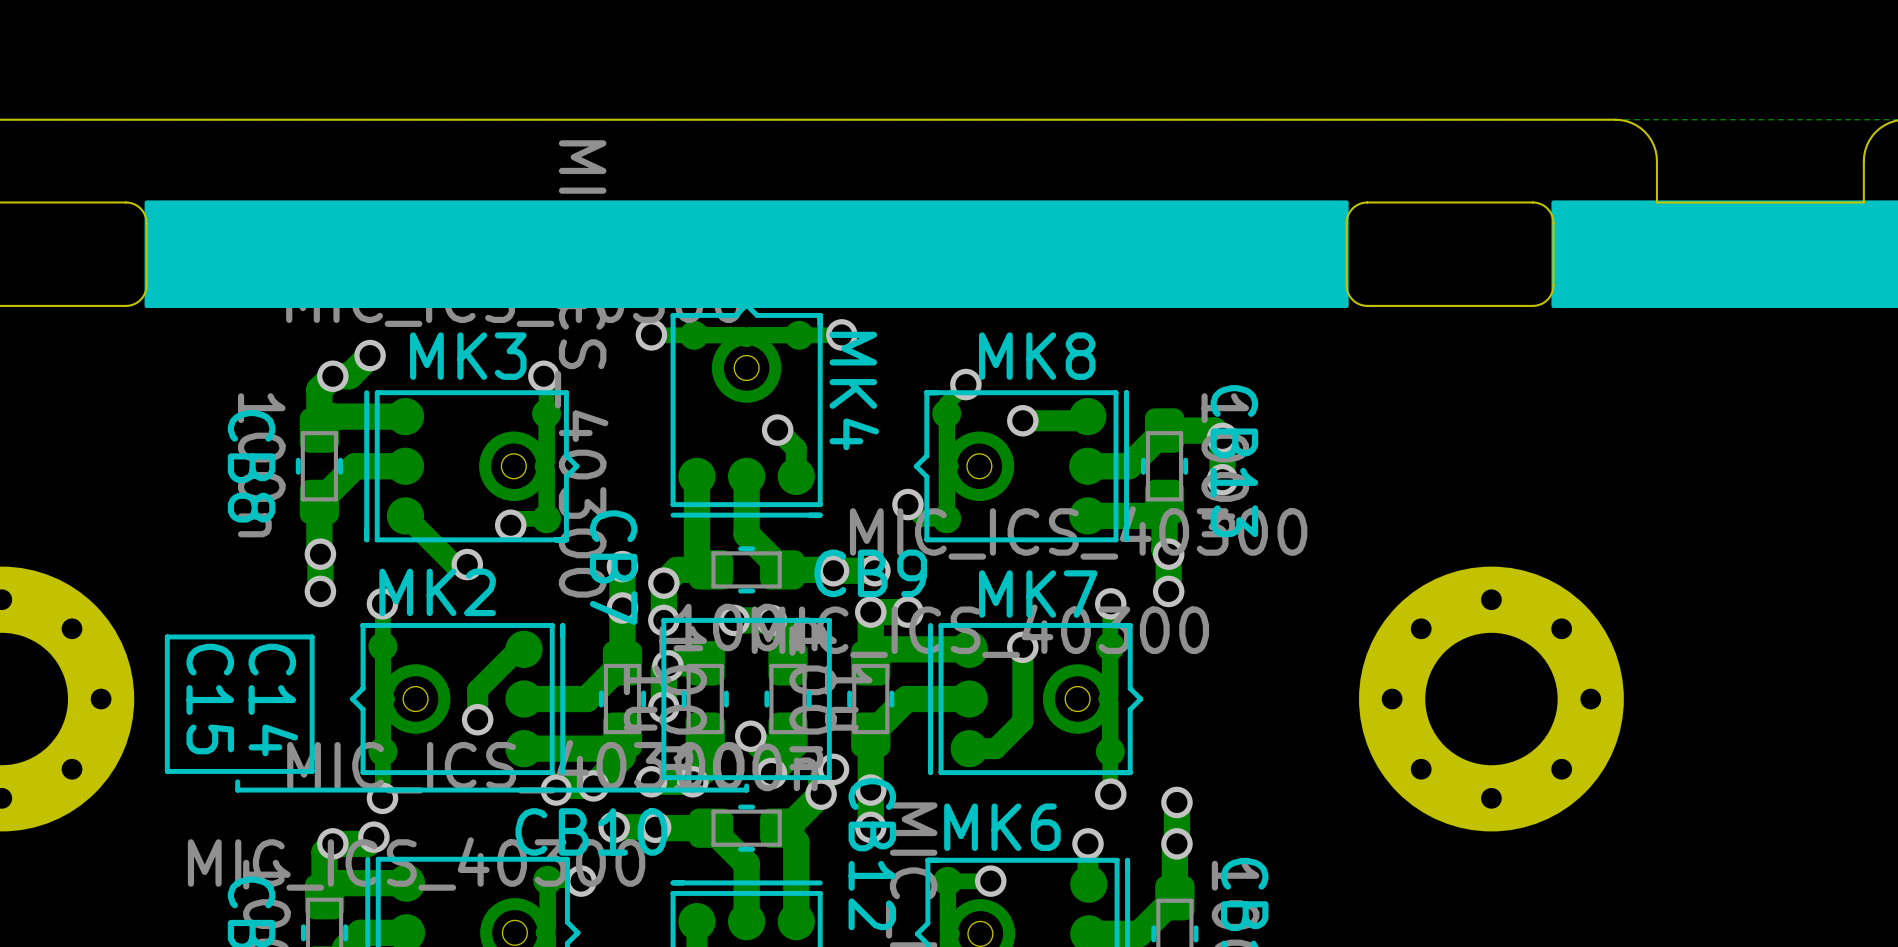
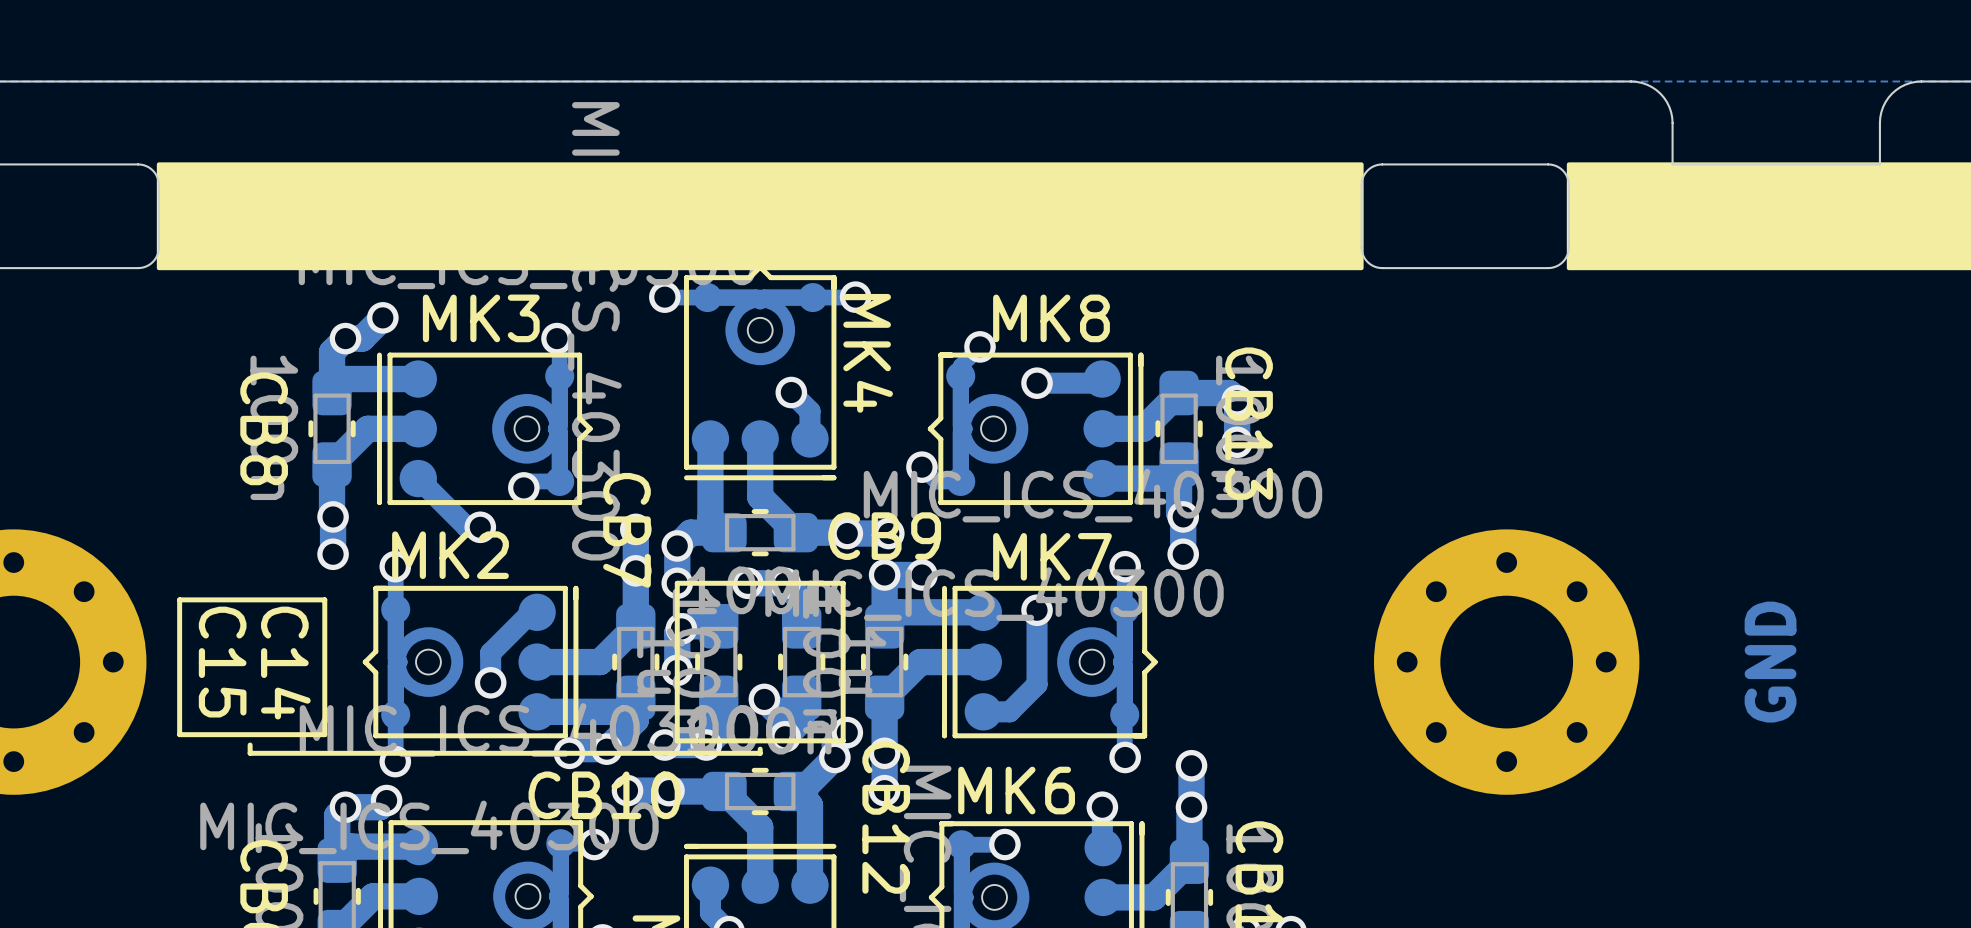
text: none -> GND (1770, 662)

